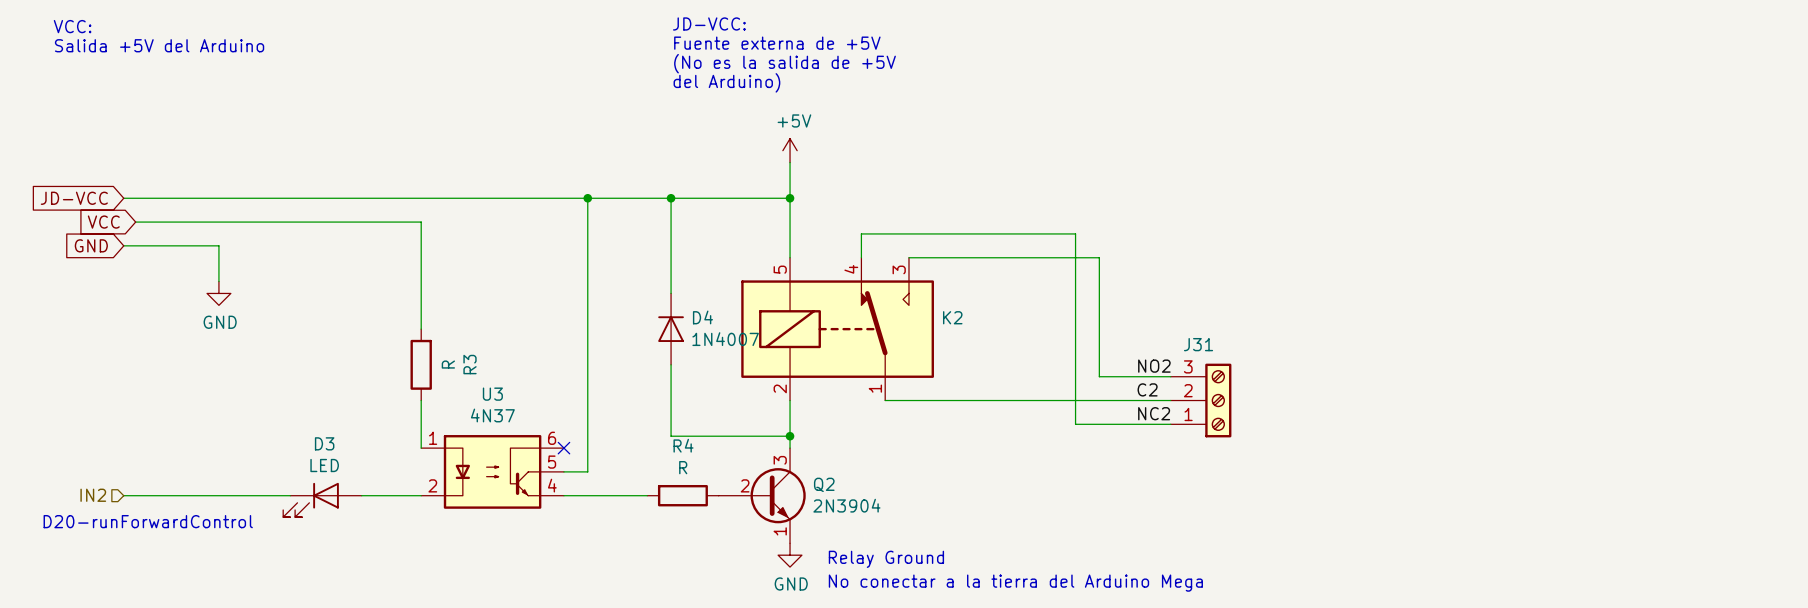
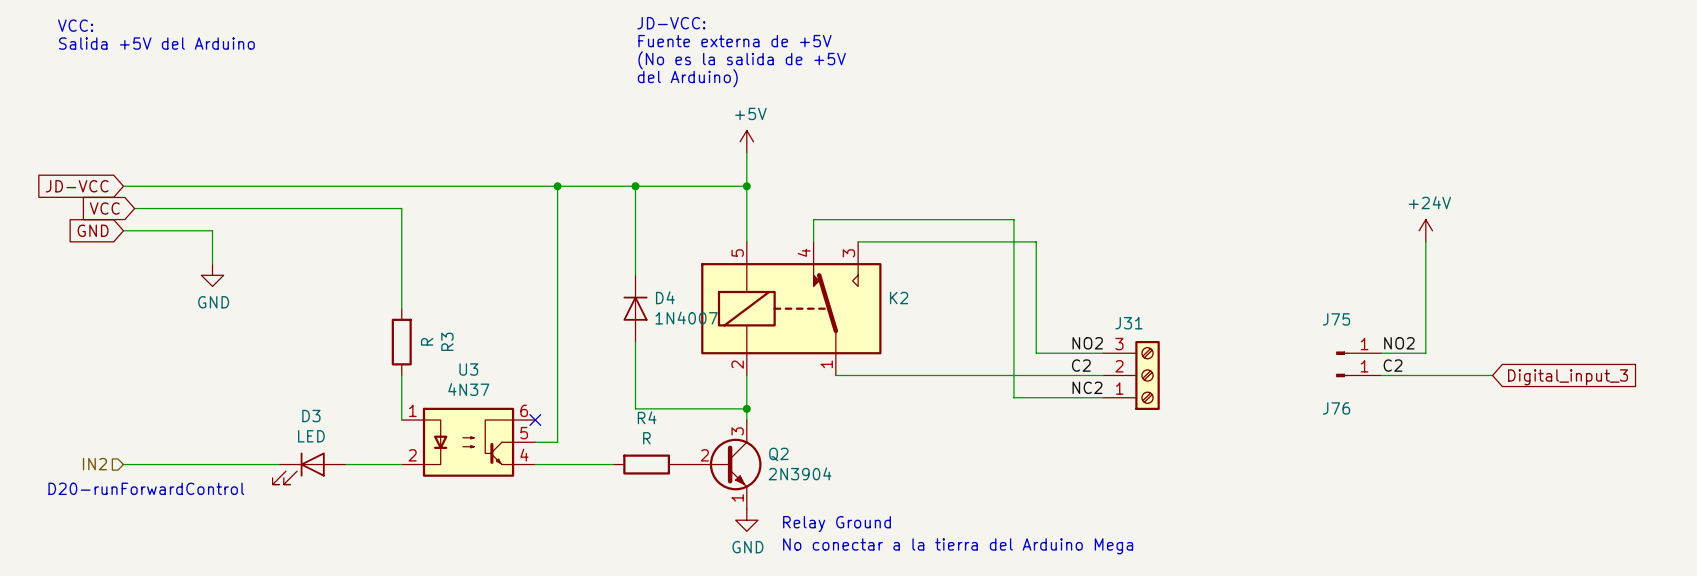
power symbol: none -> +24V (1425, 230)
wire: none -> (1425, 241) (1425, 353) (1381, 353)
label: none -> NO2 (1399, 343)
J75: none -> (1358, 353)
label: none -> C2 (1393, 365)
J76: none -> (1358, 375)
wire: none -> (1381, 375) (1492, 375)
global label: none -> Digital_input_3 (1568, 377)

